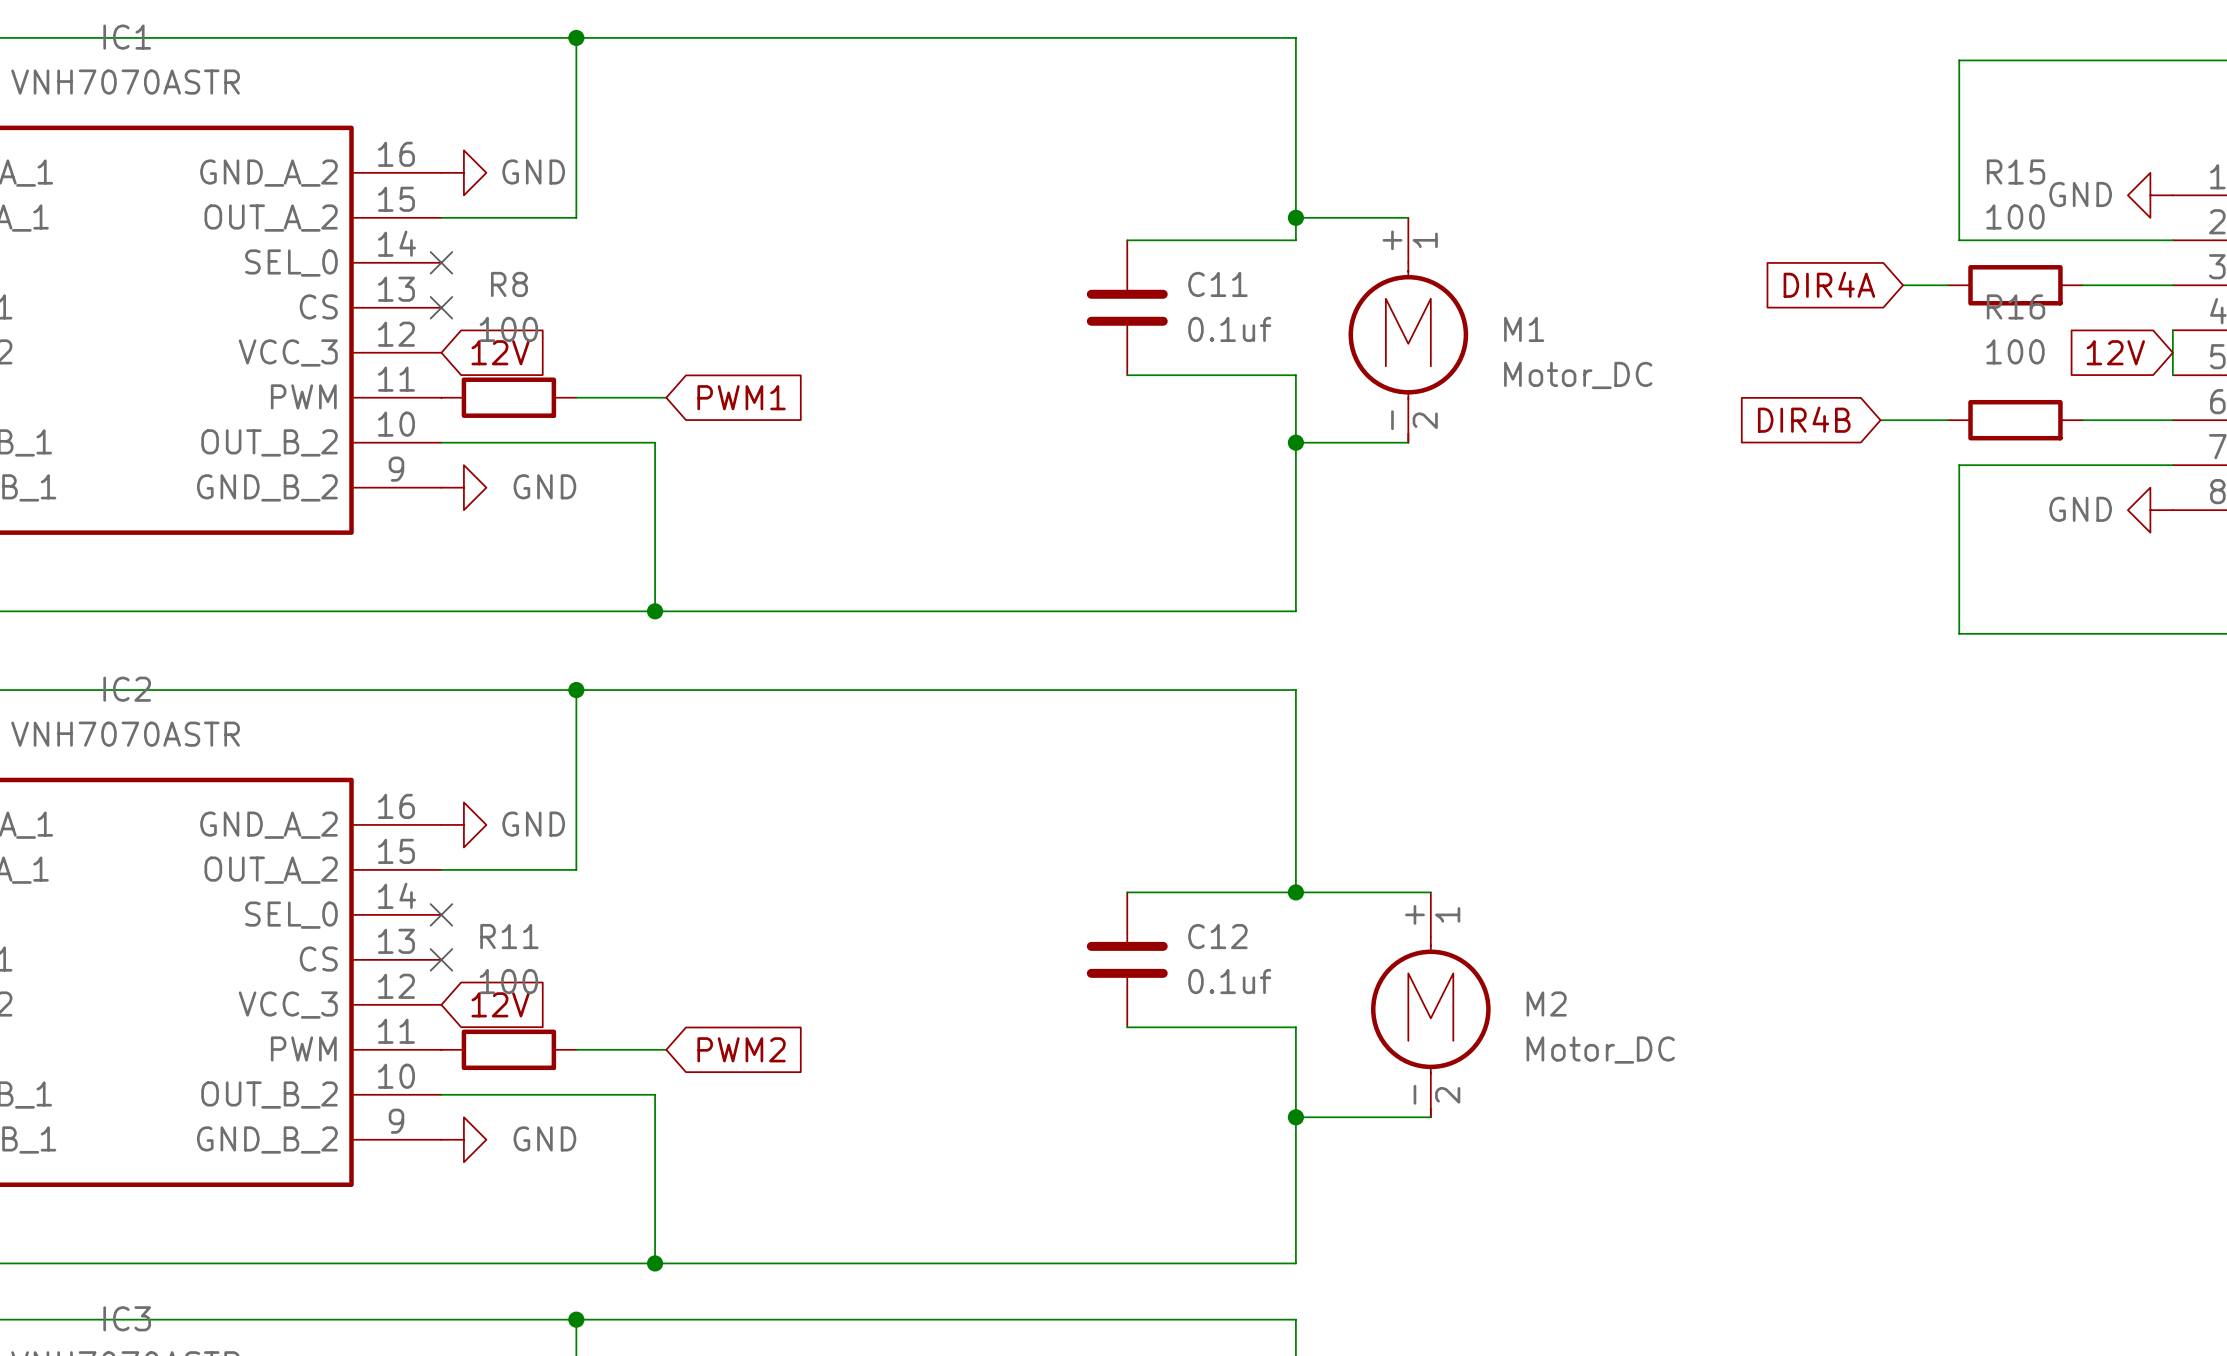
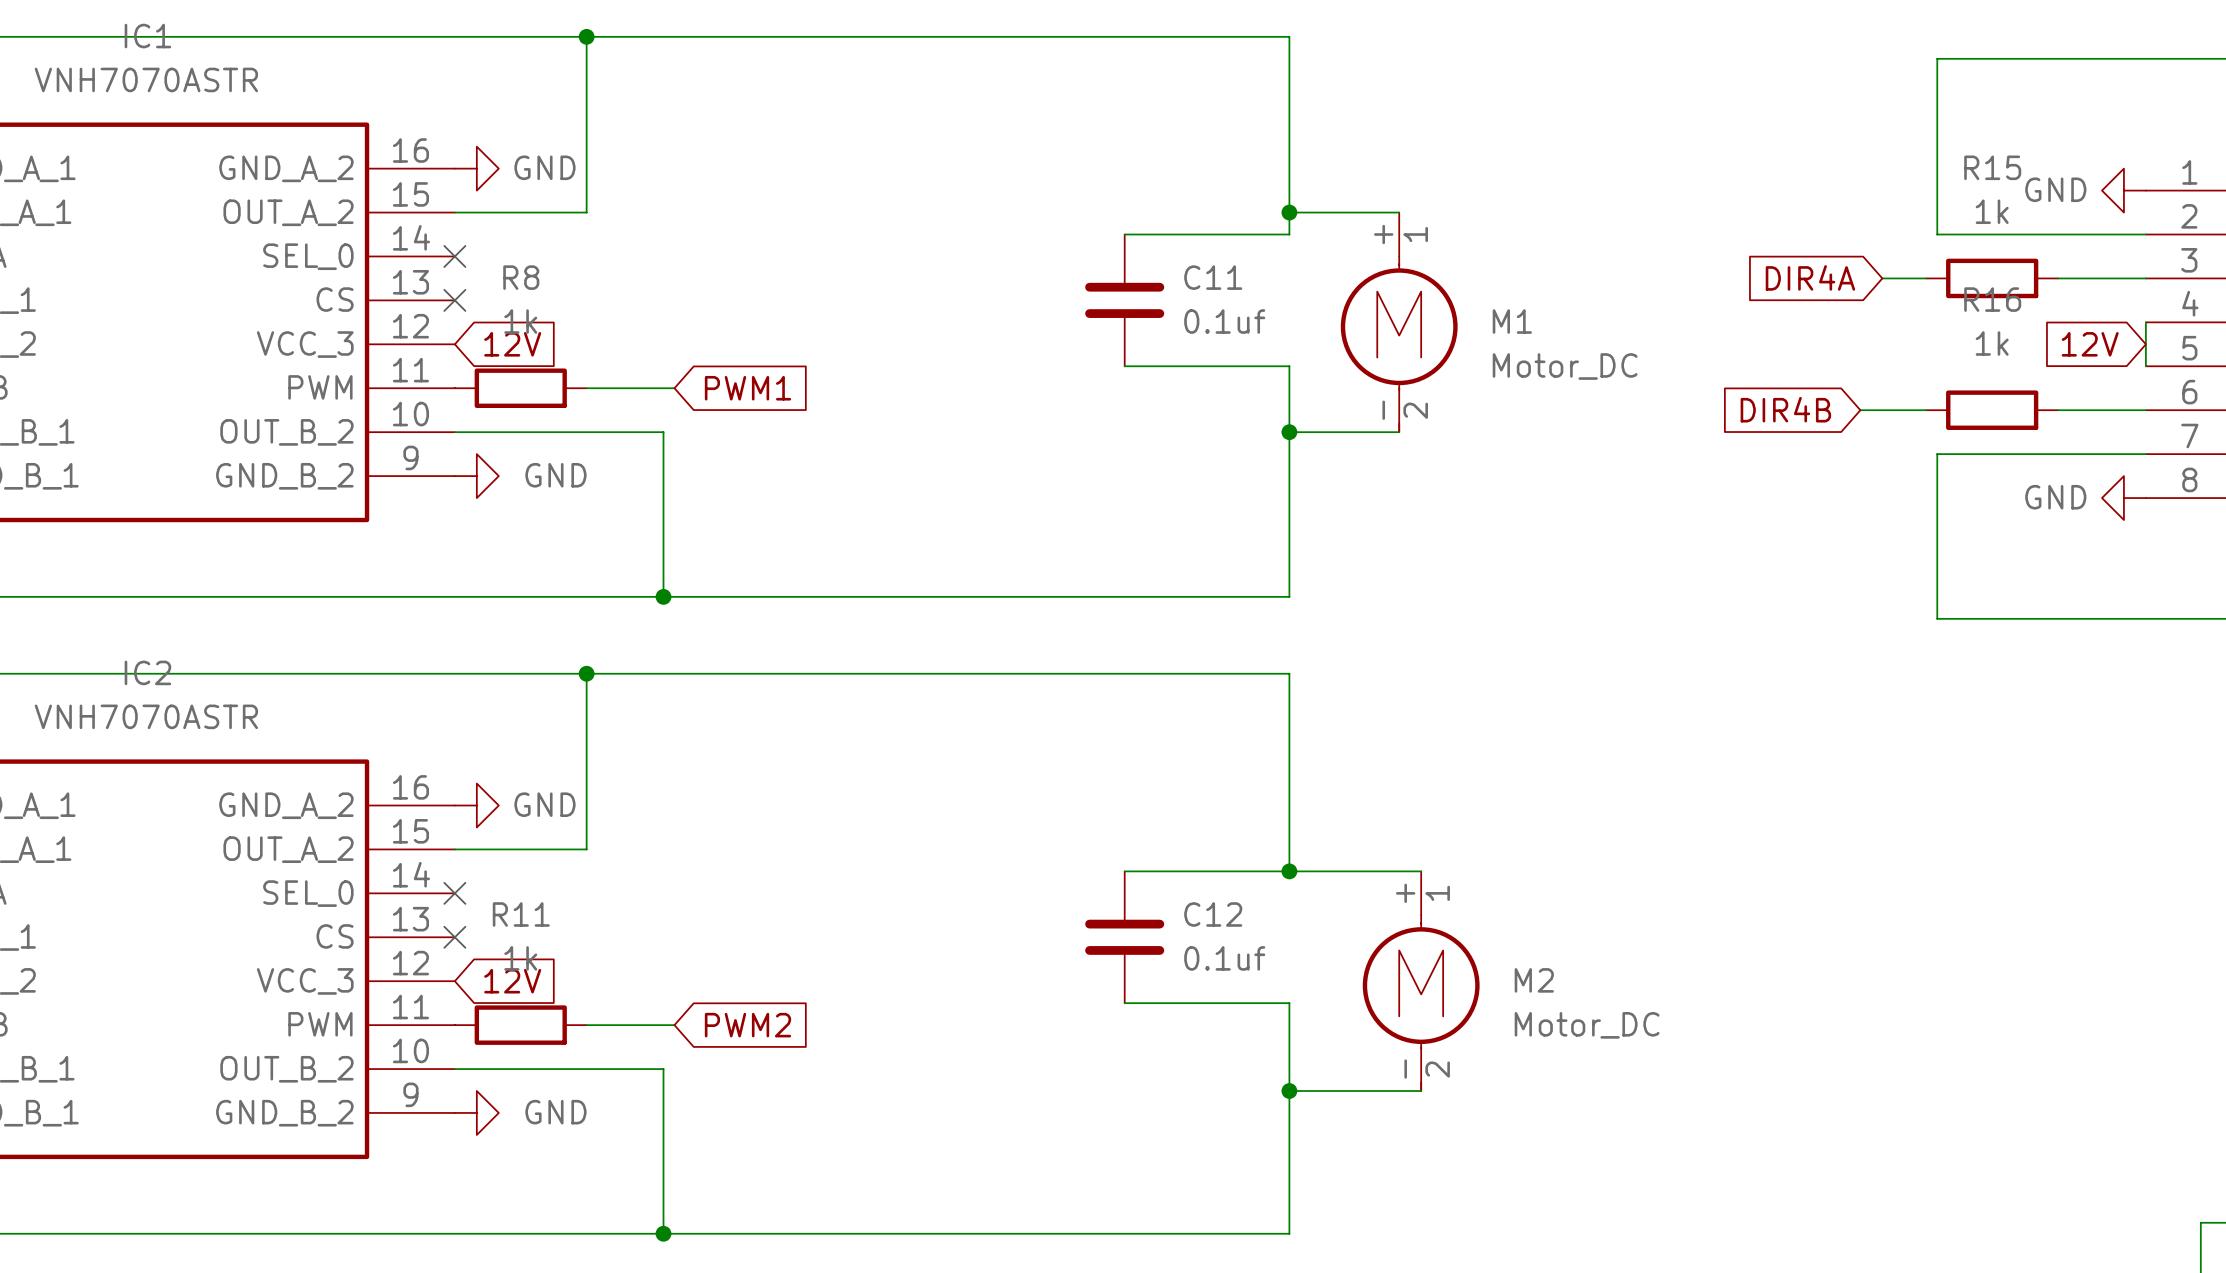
R15 value: 100 (2015, 216) -> 1k (1992, 211)
R8 value: 100 (508, 329) -> 1k (520, 321)
R16 value: 100 (2015, 351) -> 1k (1992, 343)
R11 value: 100 (508, 981) -> 1k (520, 958)

